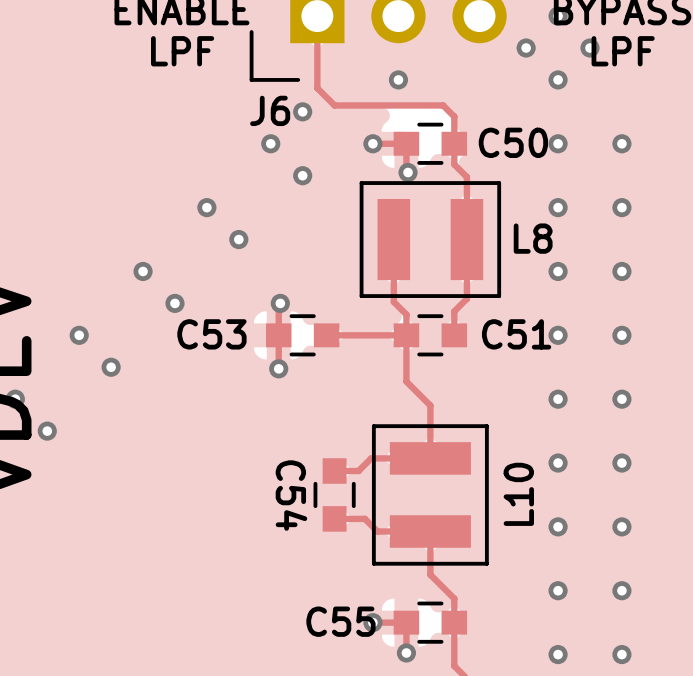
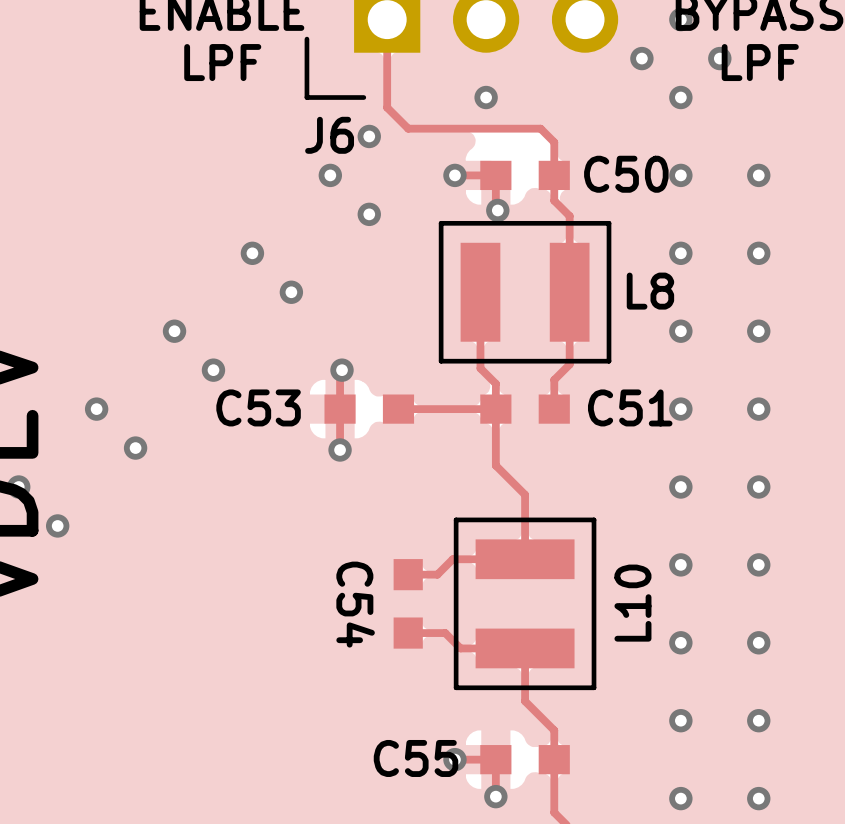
C50 footprint: [393, 122, 468, 165] -> [480, 160, 570, 191]
C53 footprint: [265, 314, 340, 357] -> [324, 394, 415, 424]
C51 footprint: [393, 314, 468, 357] -> [480, 394, 570, 424]
C54 footprint: [313, 458, 356, 532] -> [393, 559, 423, 649]
C55 footprint: [393, 601, 468, 644] -> [480, 745, 570, 775]

